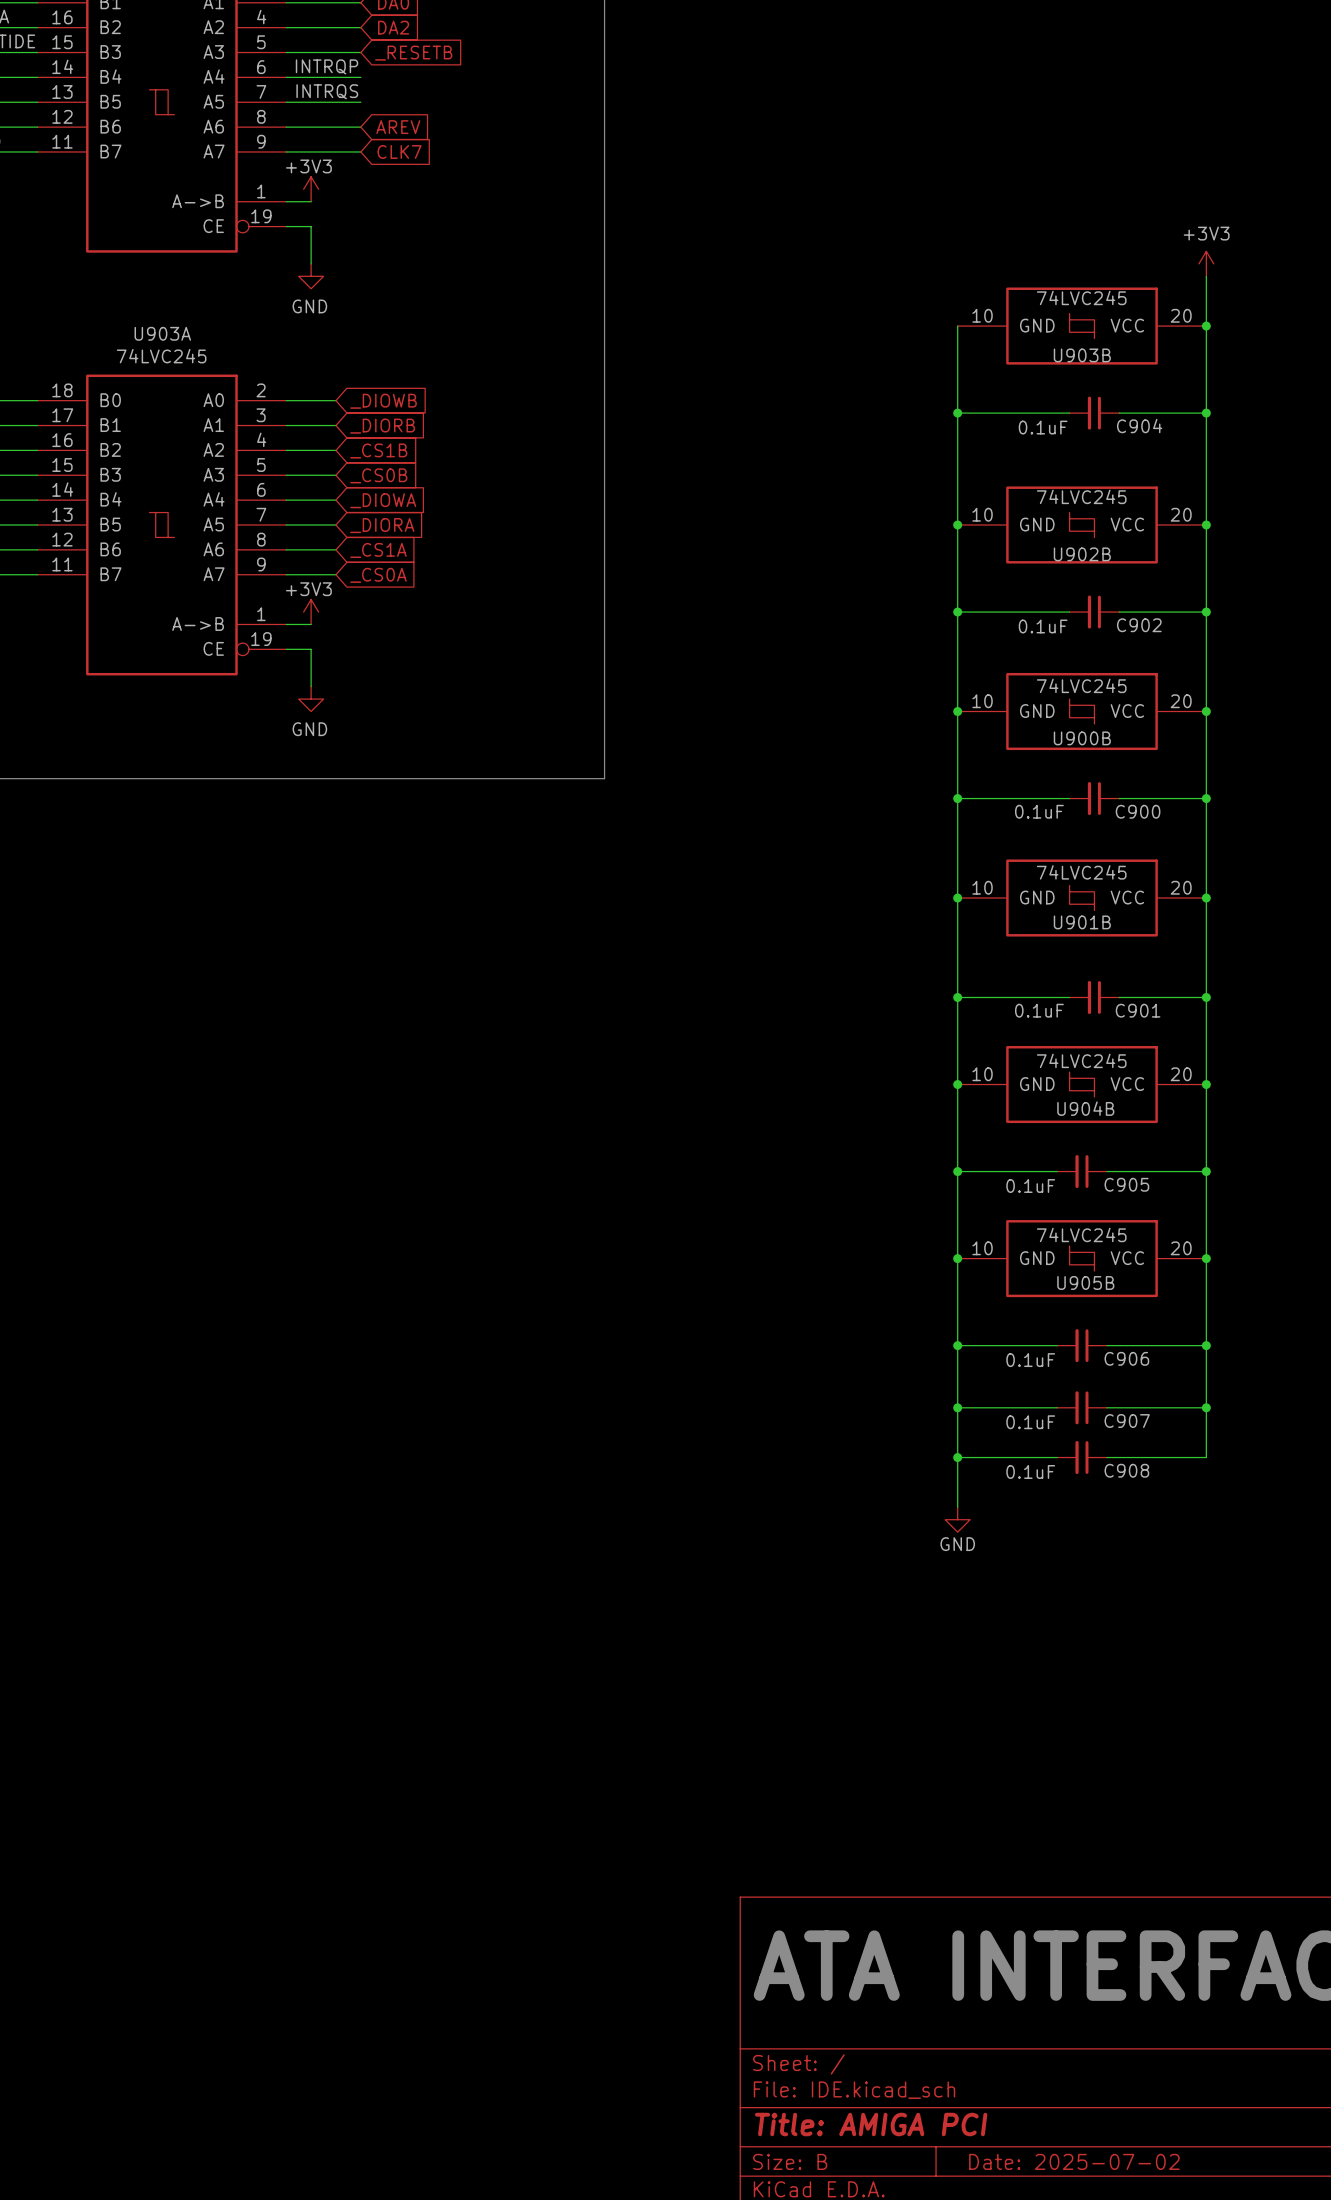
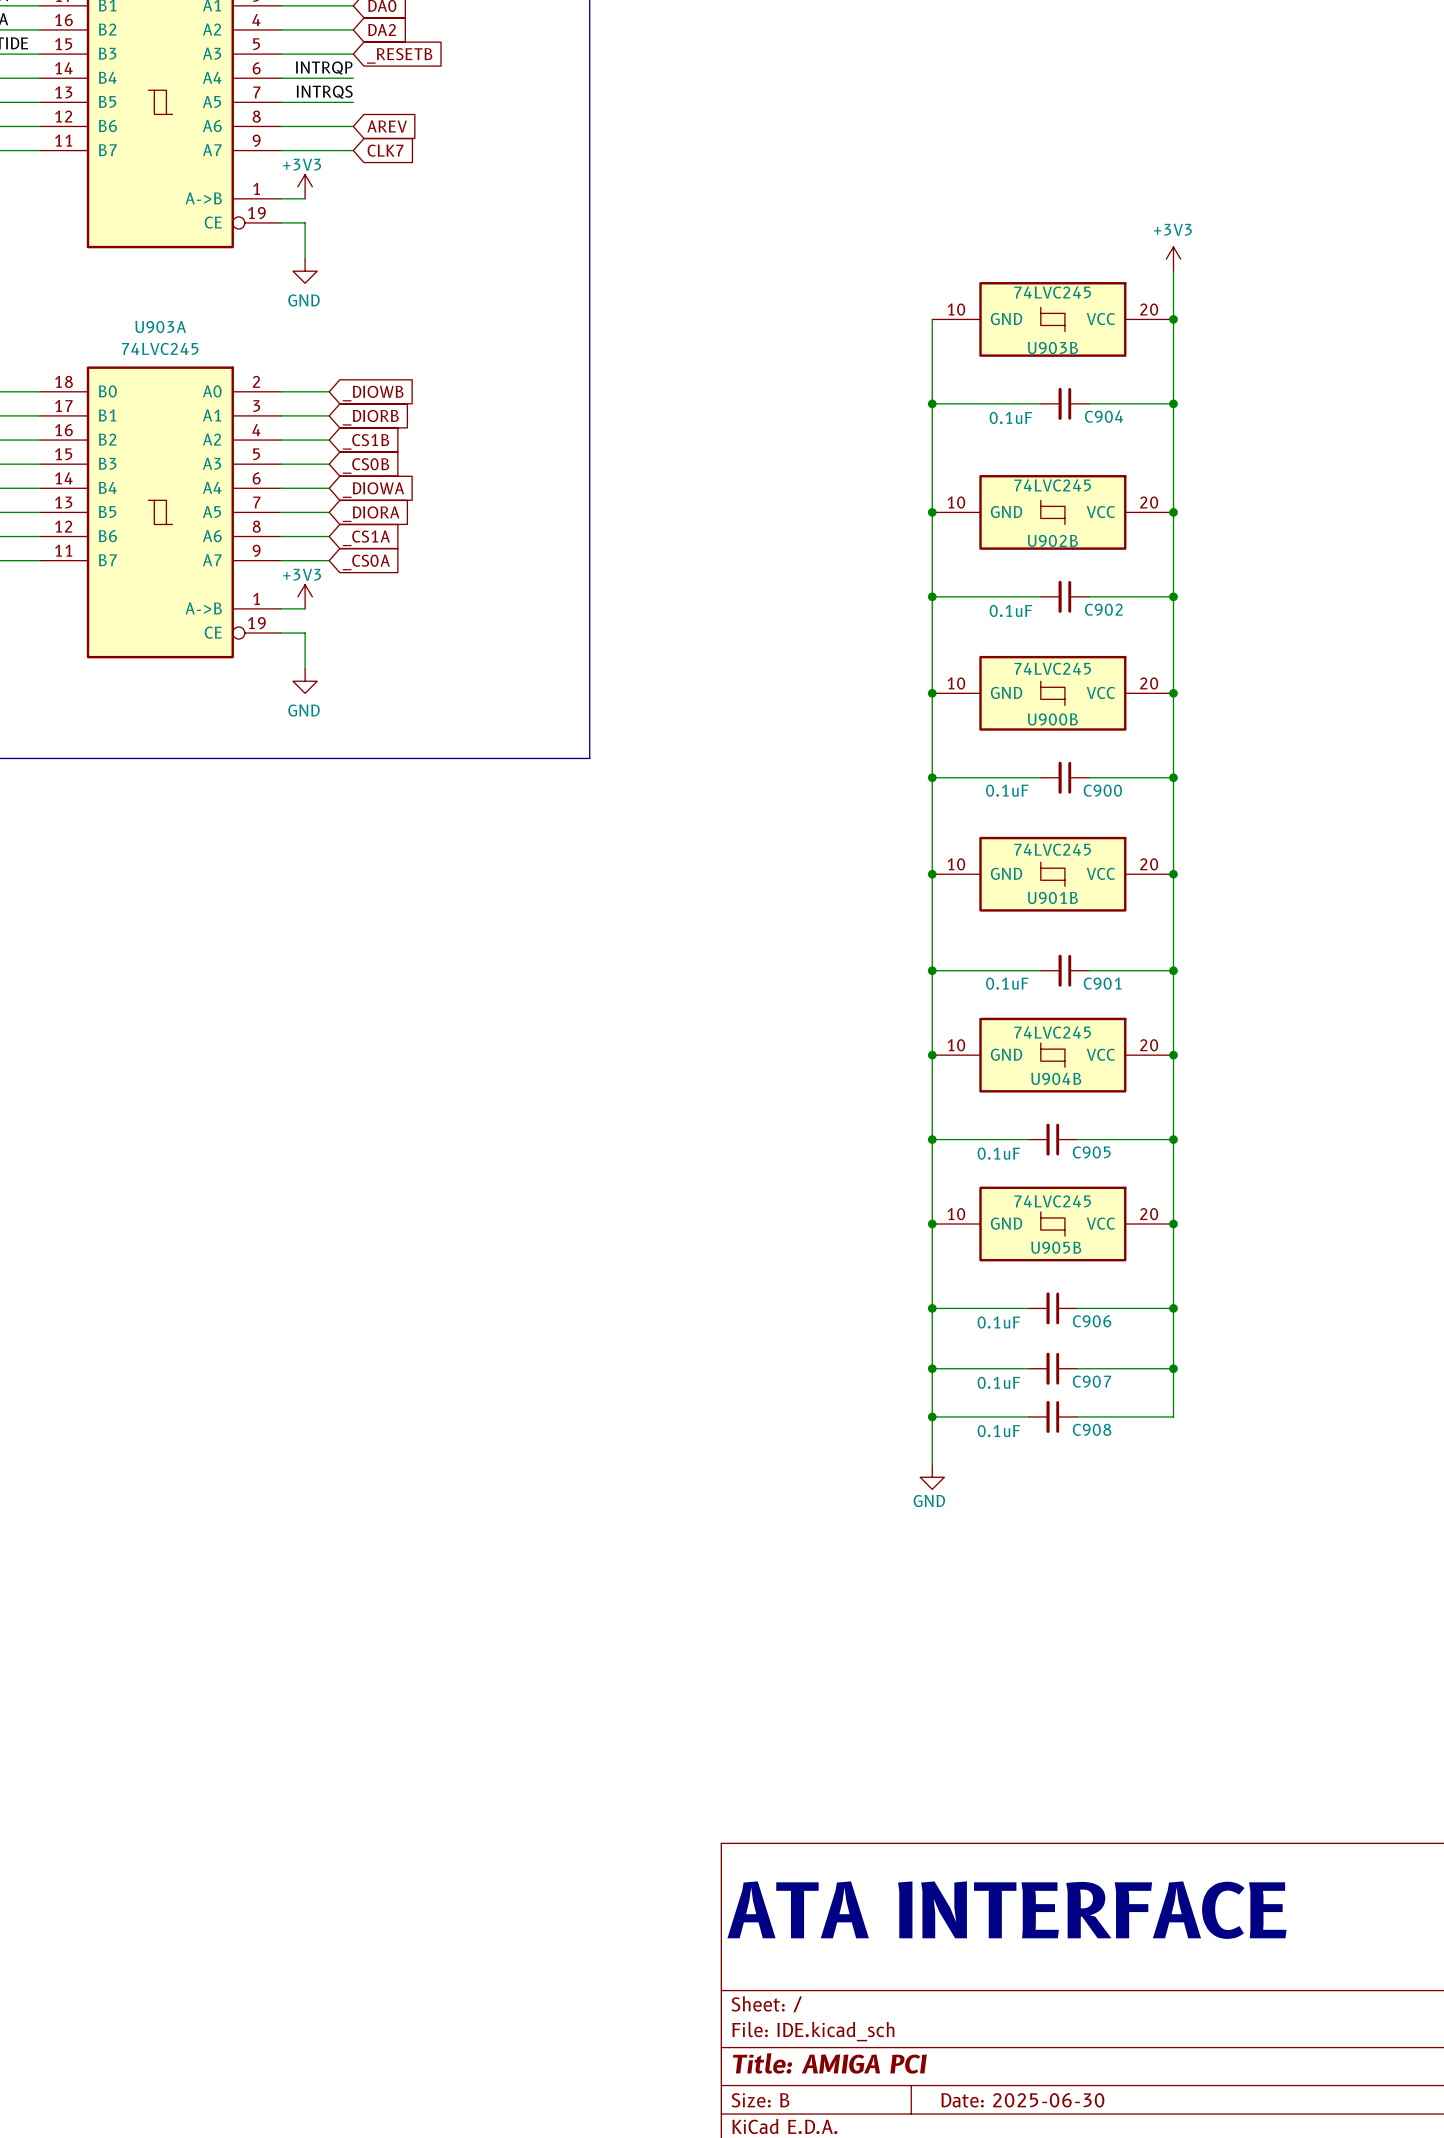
title block: Date: 2025-07-02 (1074, 2161) -> Date: 2025-06-30 (1022, 2100)

